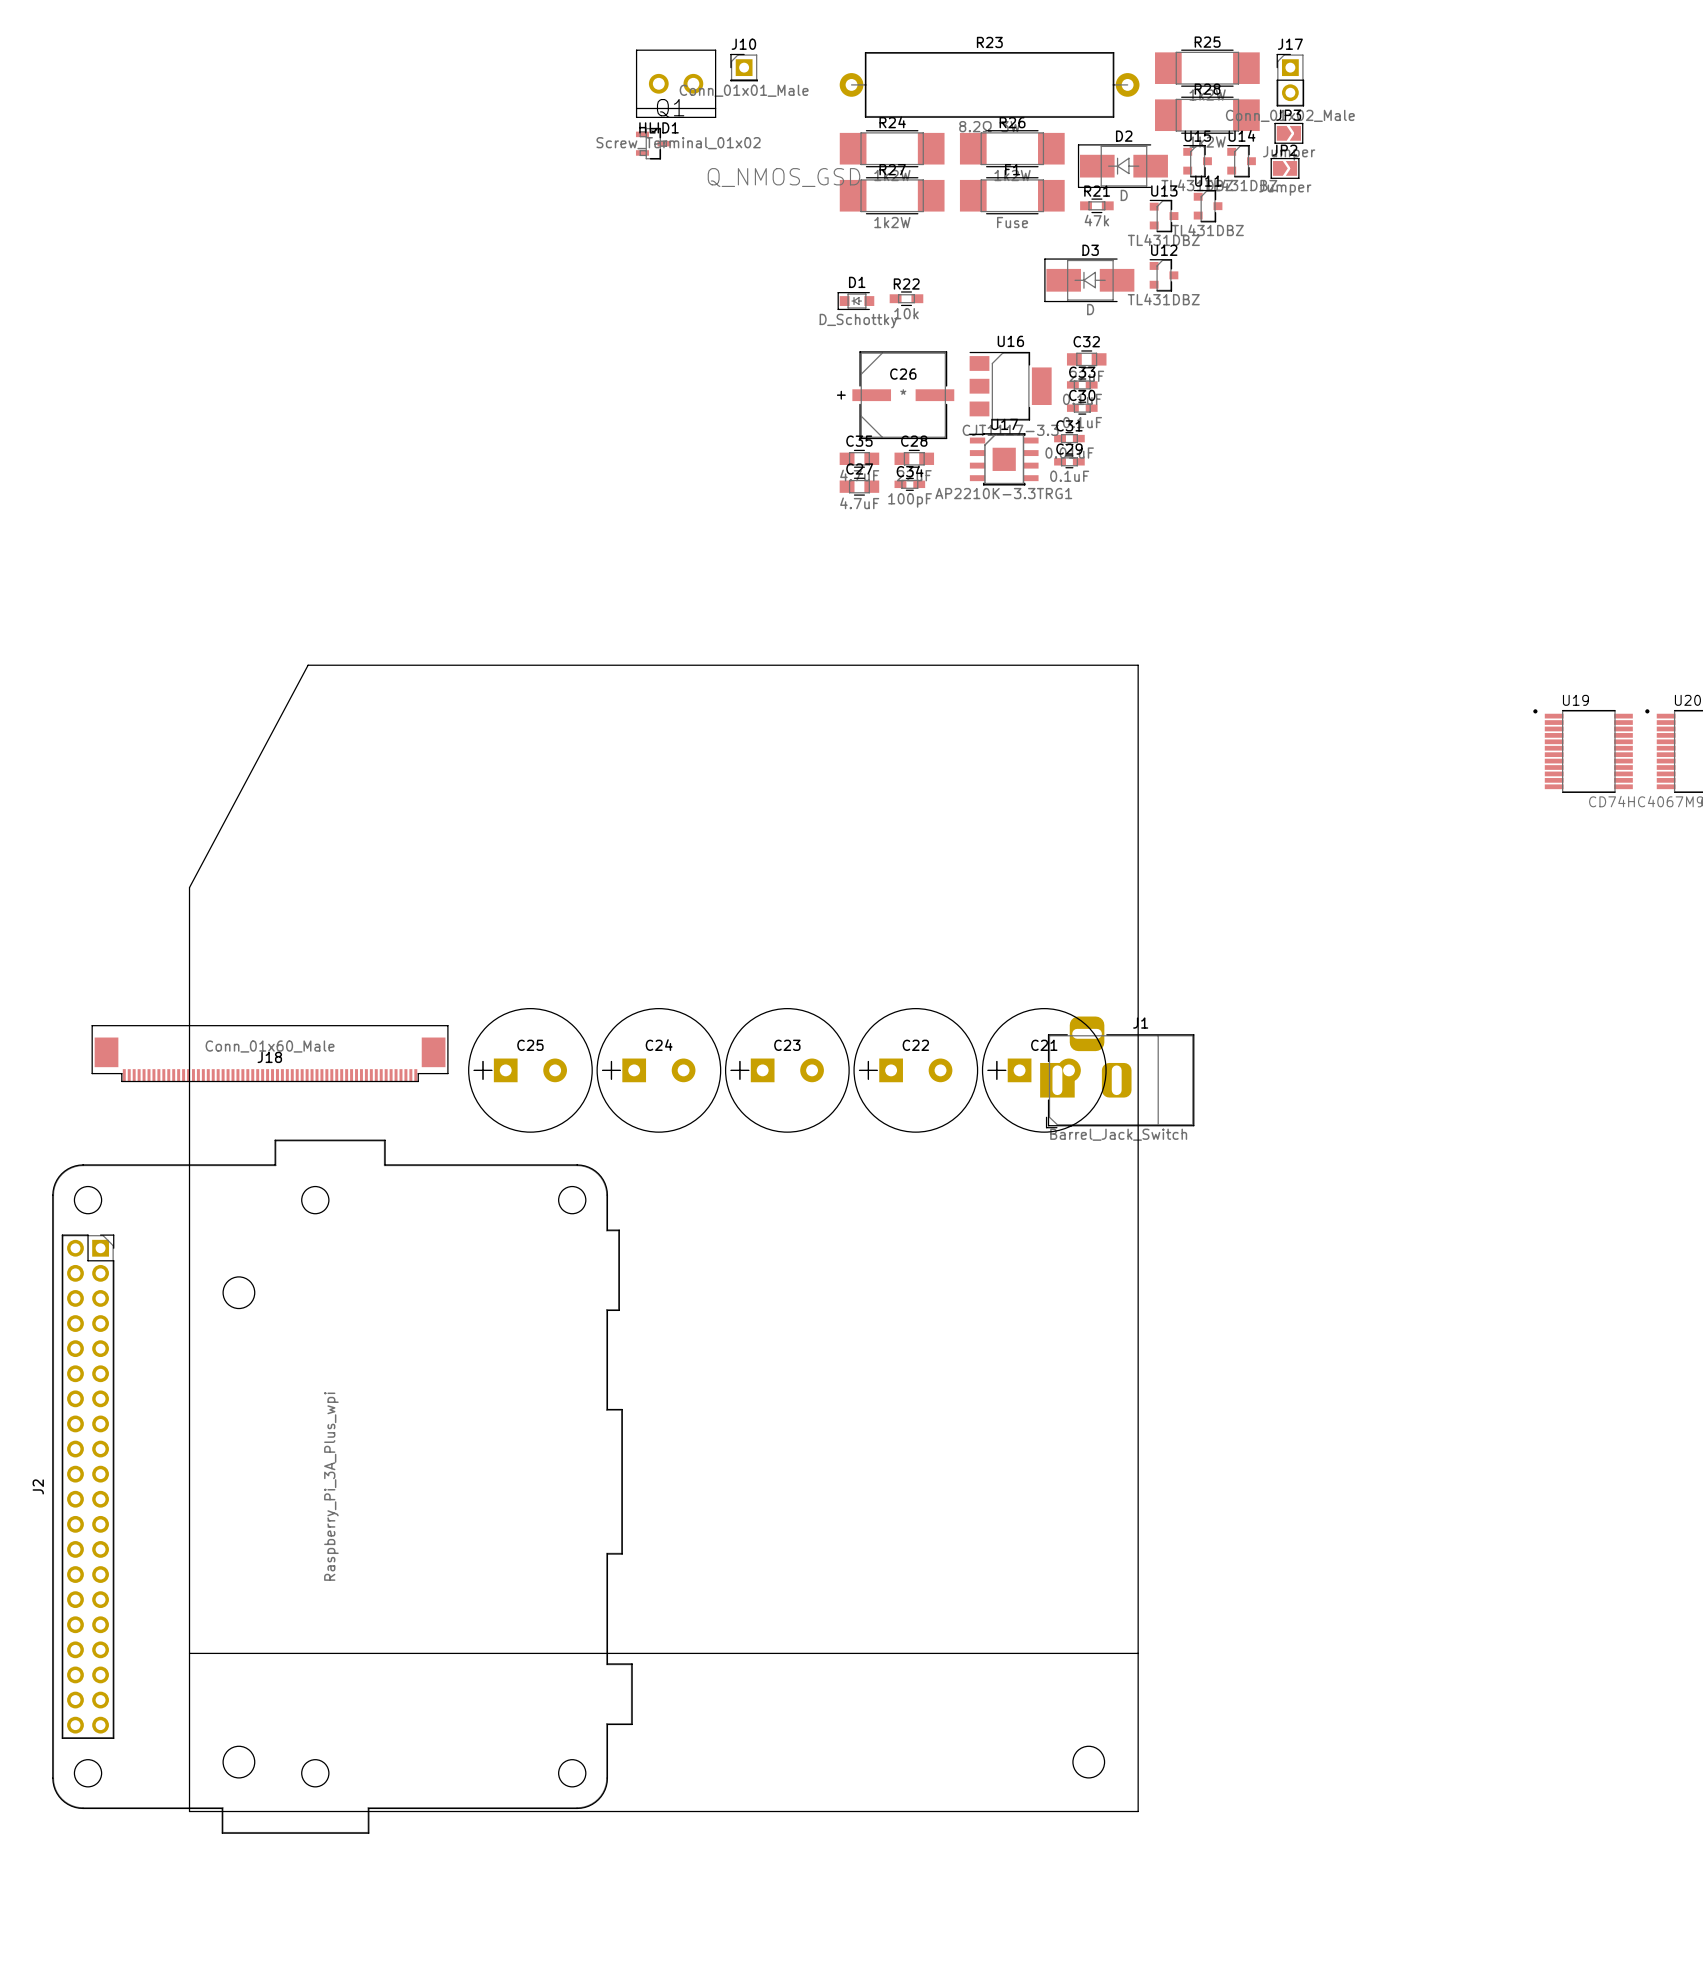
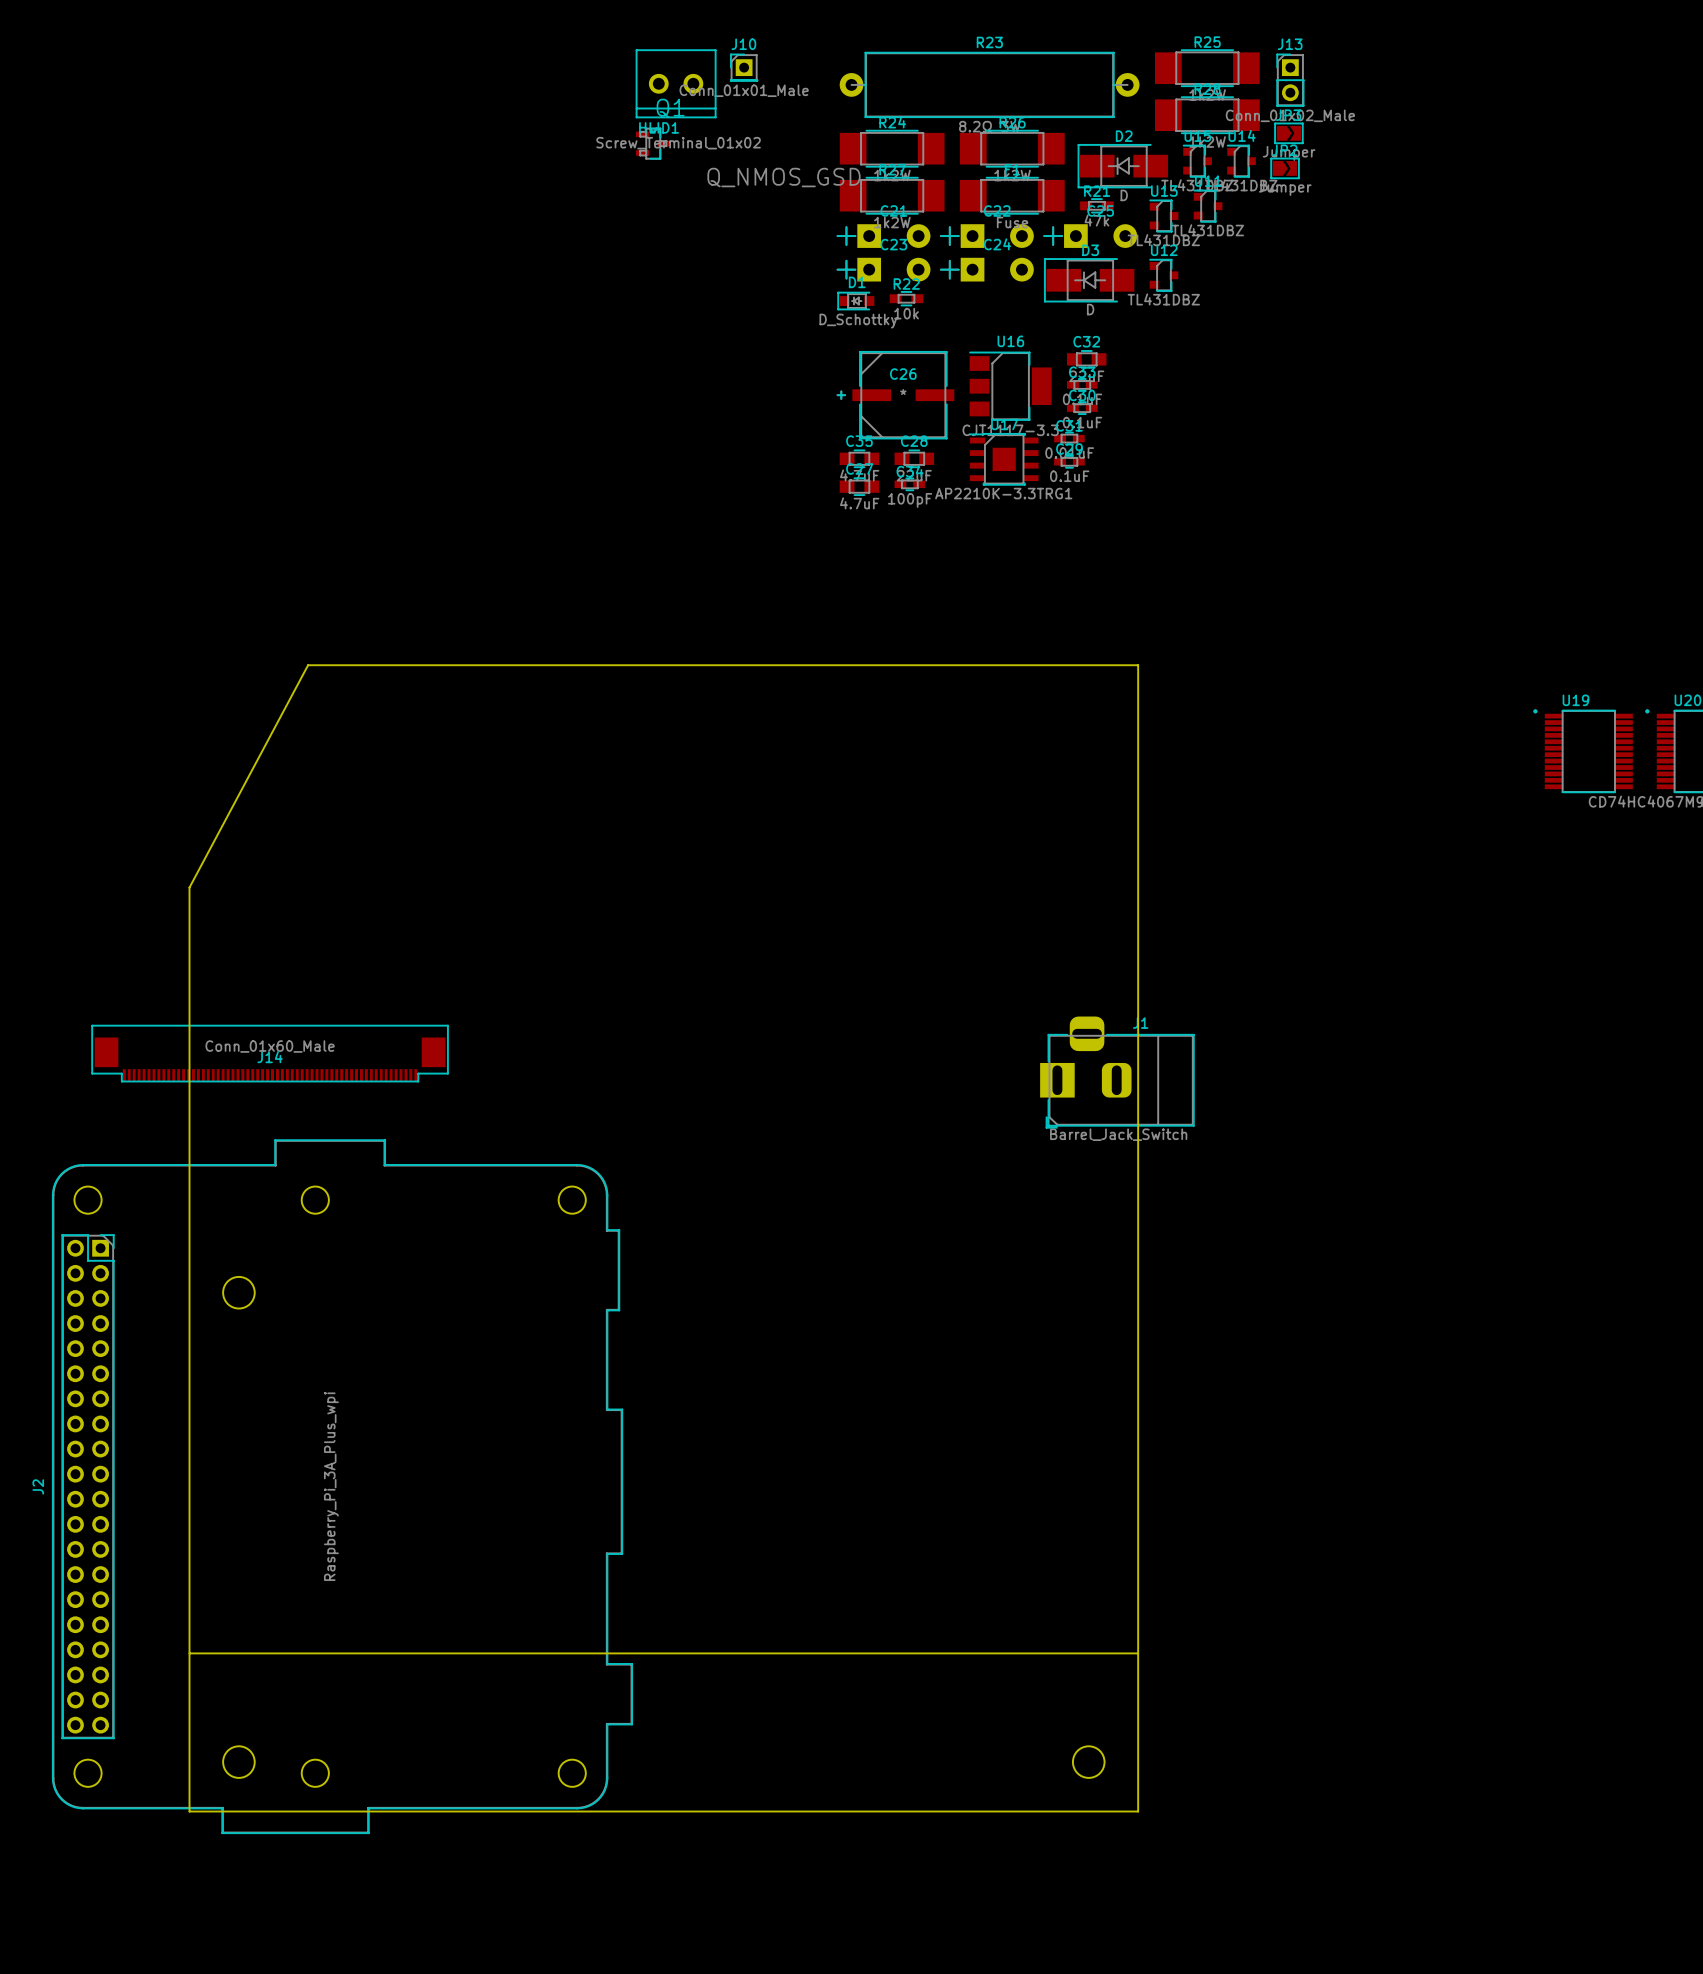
J17 name: J17 (1290, 44) -> J13 (1290, 44)
C25 footprint: [468, 1008, 593, 1133] -> [1043, 224, 1138, 248]
C24 footprint: [596, 1008, 722, 1133] -> [940, 257, 1034, 282]
C23 footprint: [725, 1008, 850, 1133] -> [836, 257, 931, 282]
C22 footprint: [853, 1008, 979, 1133] -> [940, 224, 1034, 248]
C21 footprint: [981, 1008, 1107, 1133] -> [836, 224, 931, 248]
J18 name: J18 (269, 1057) -> J14 (270, 1057)

